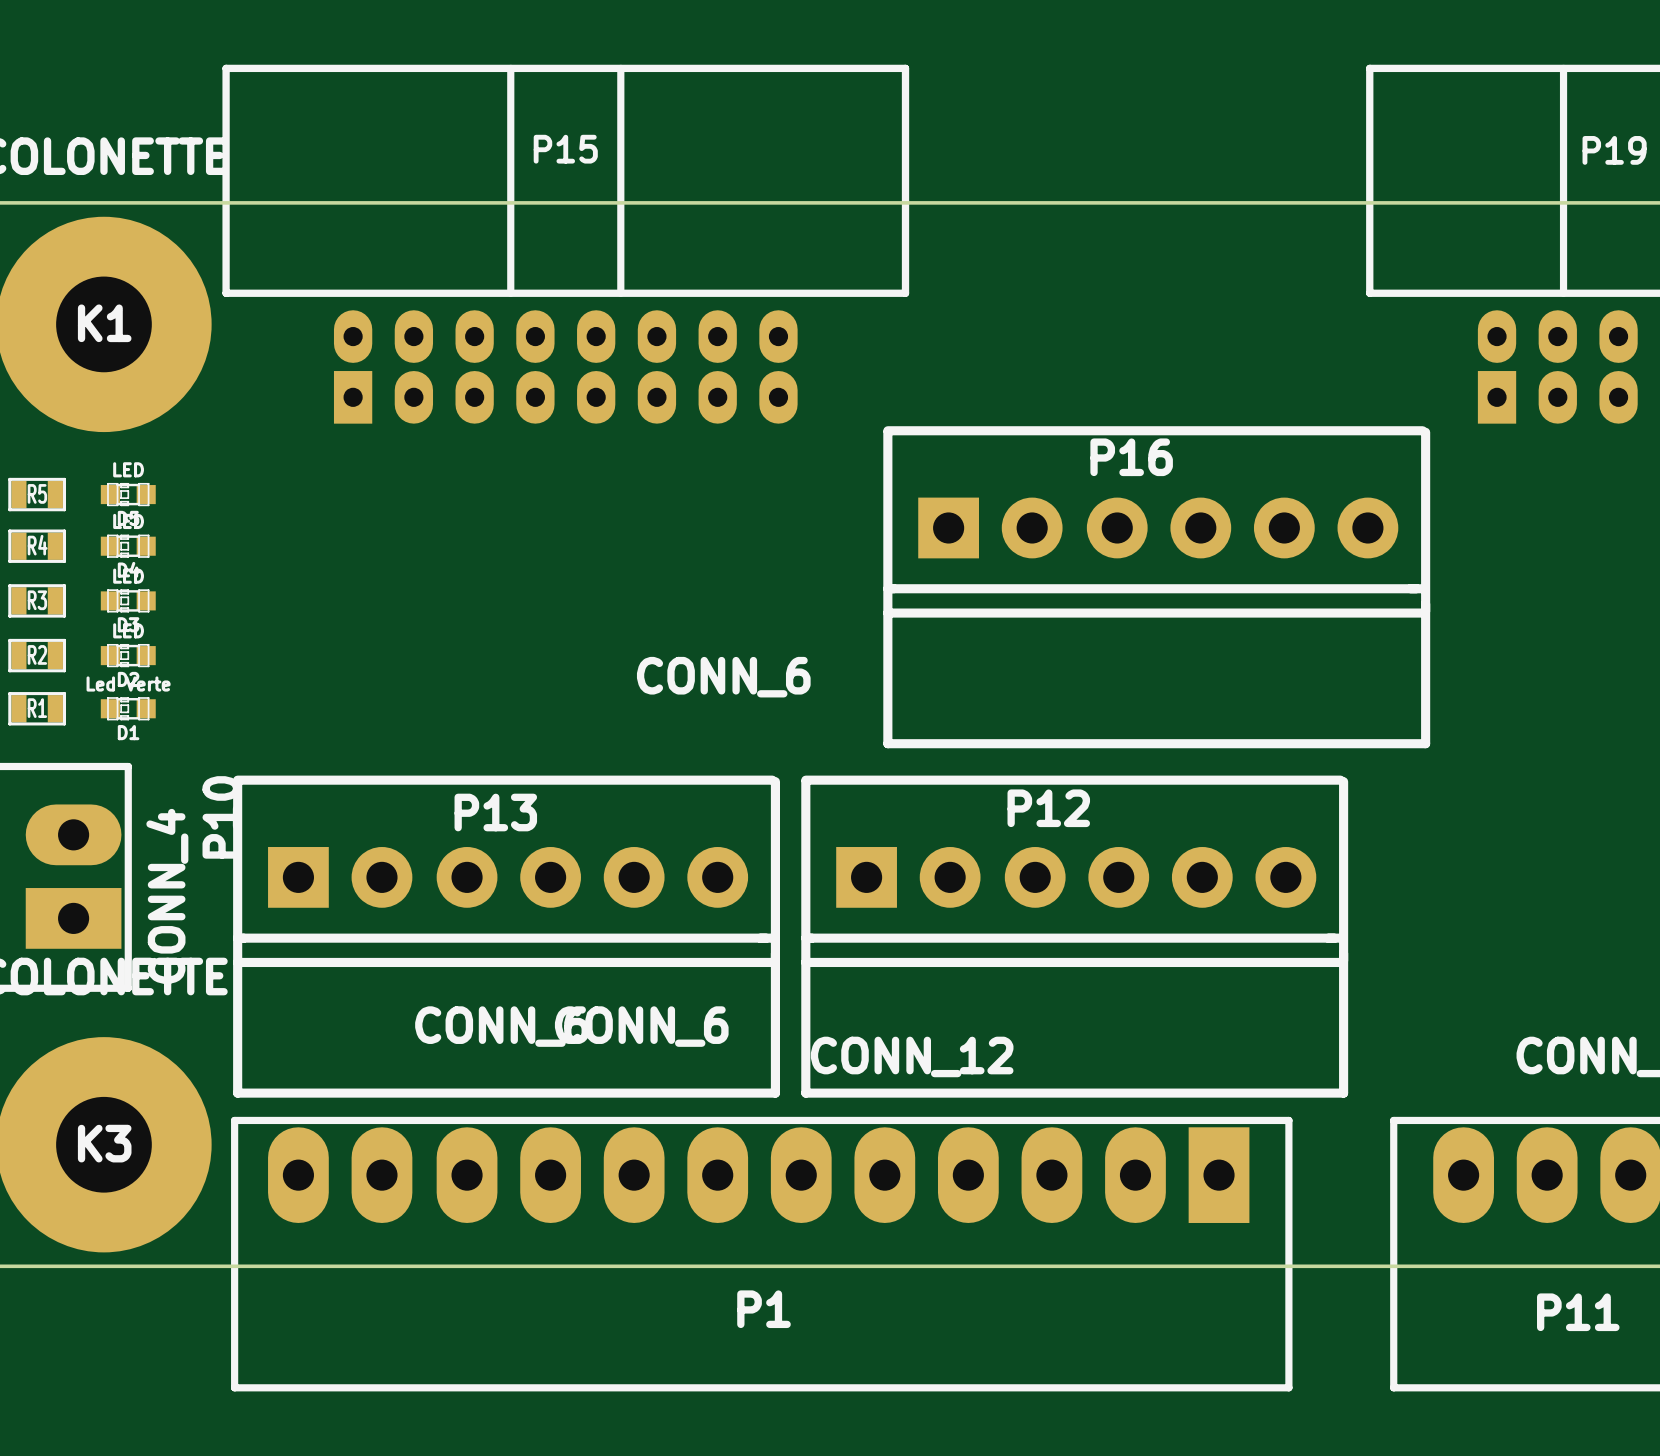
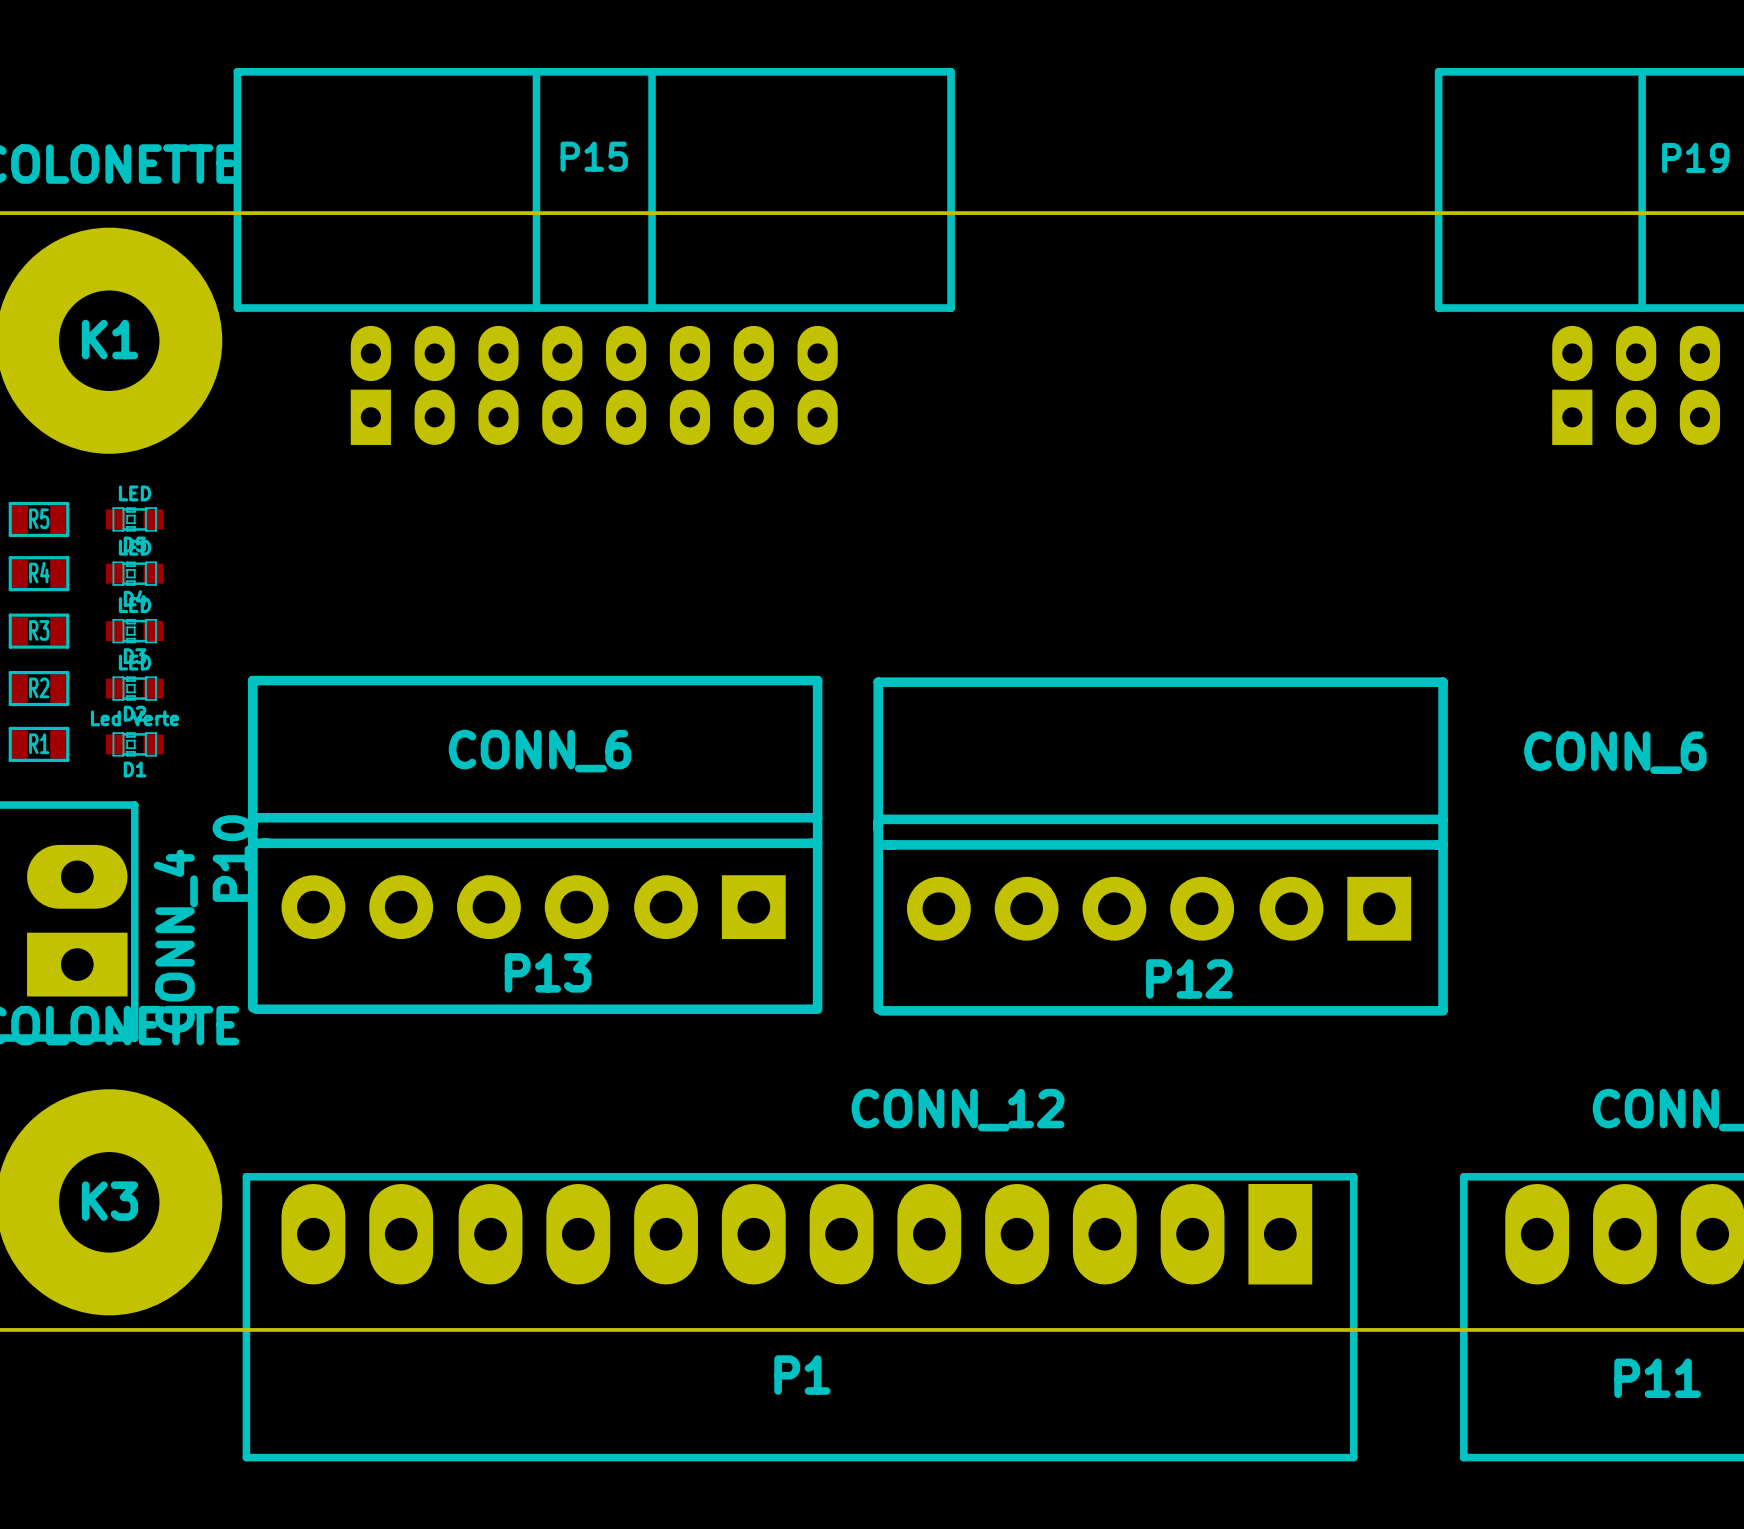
P16: CONN_6 (1156, 587) -> none
P13 rotation: 0° (506, 936) -> 180° (535, 844)
P12 rotation: 0° (1074, 936) -> 180° (1160, 846)

